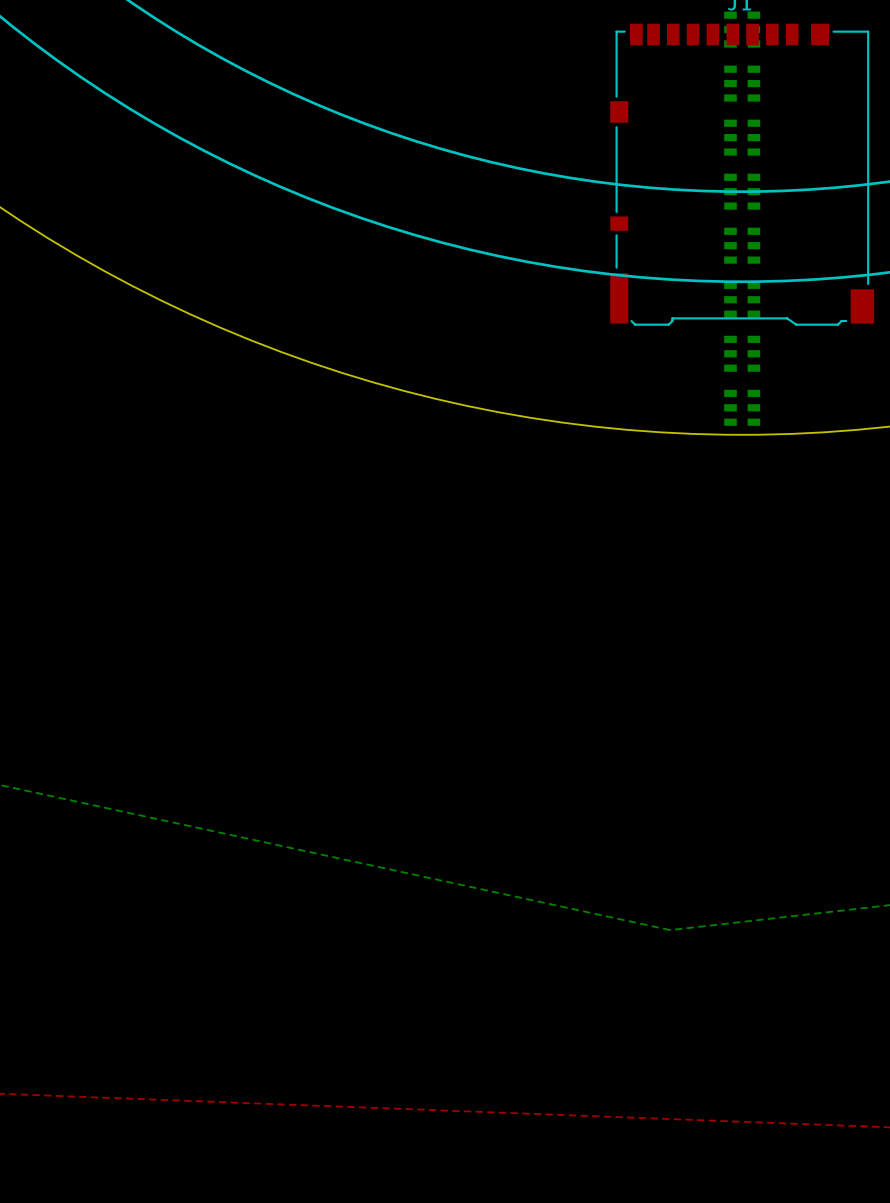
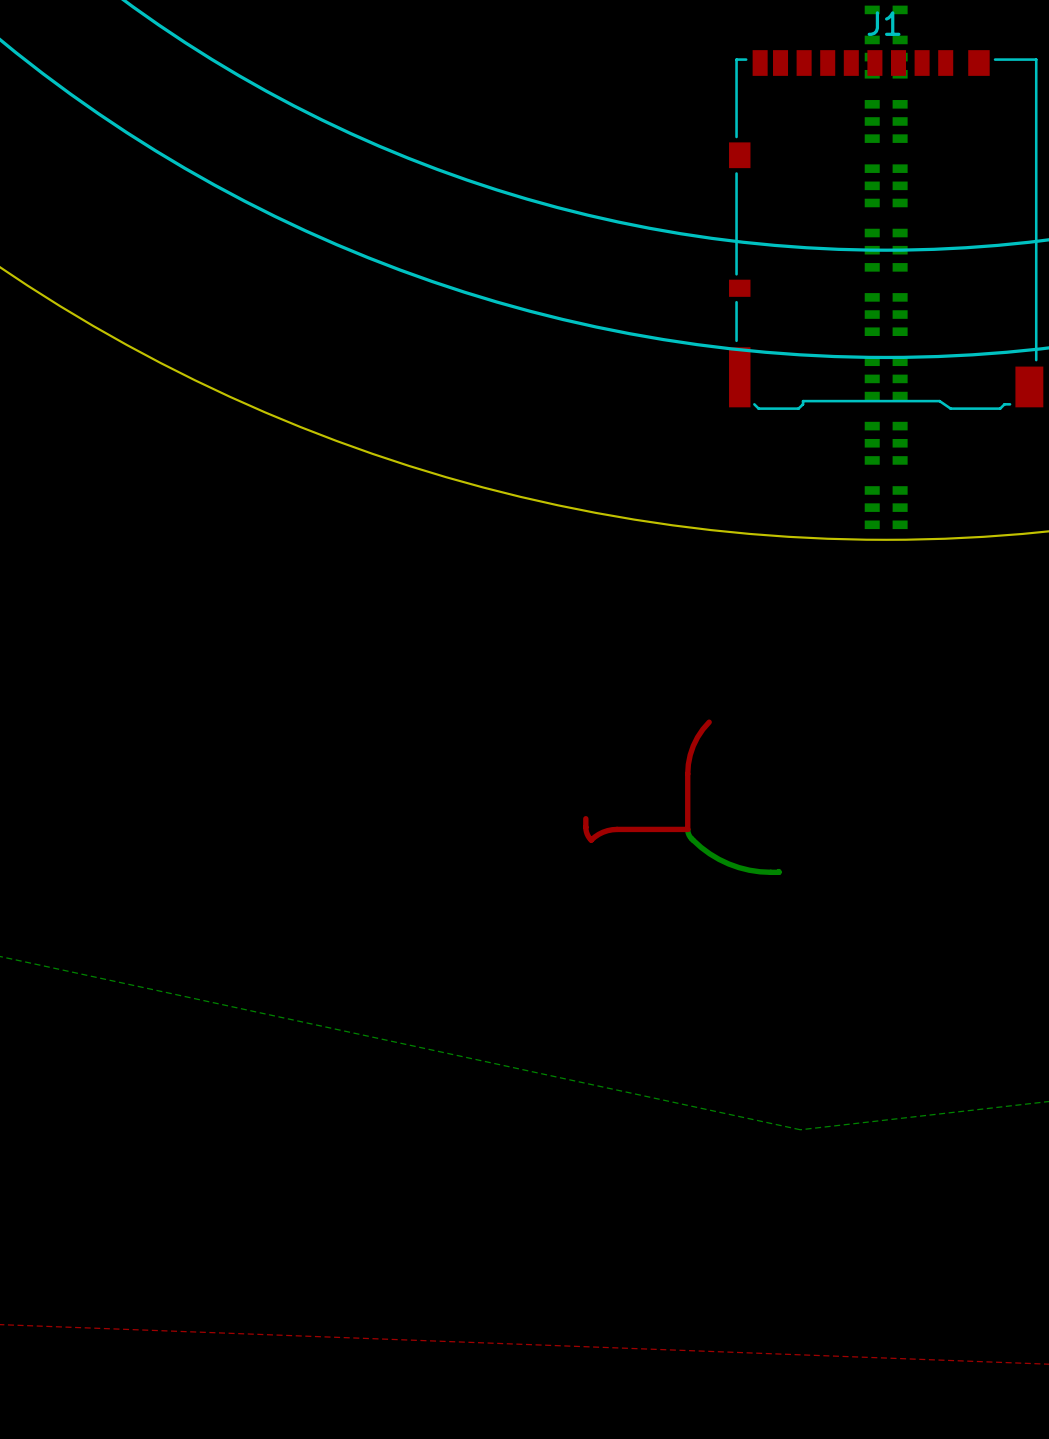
top track: none -> (709, 722) (697, 737) (690, 754) (687, 773) (687, 829) (612, 829) (598, 834) (591, 840) (586, 831) (585, 818)
bottom track: none -> (687, 829) (690, 837) (701, 847) (728, 863) (749, 870) (778, 871)

